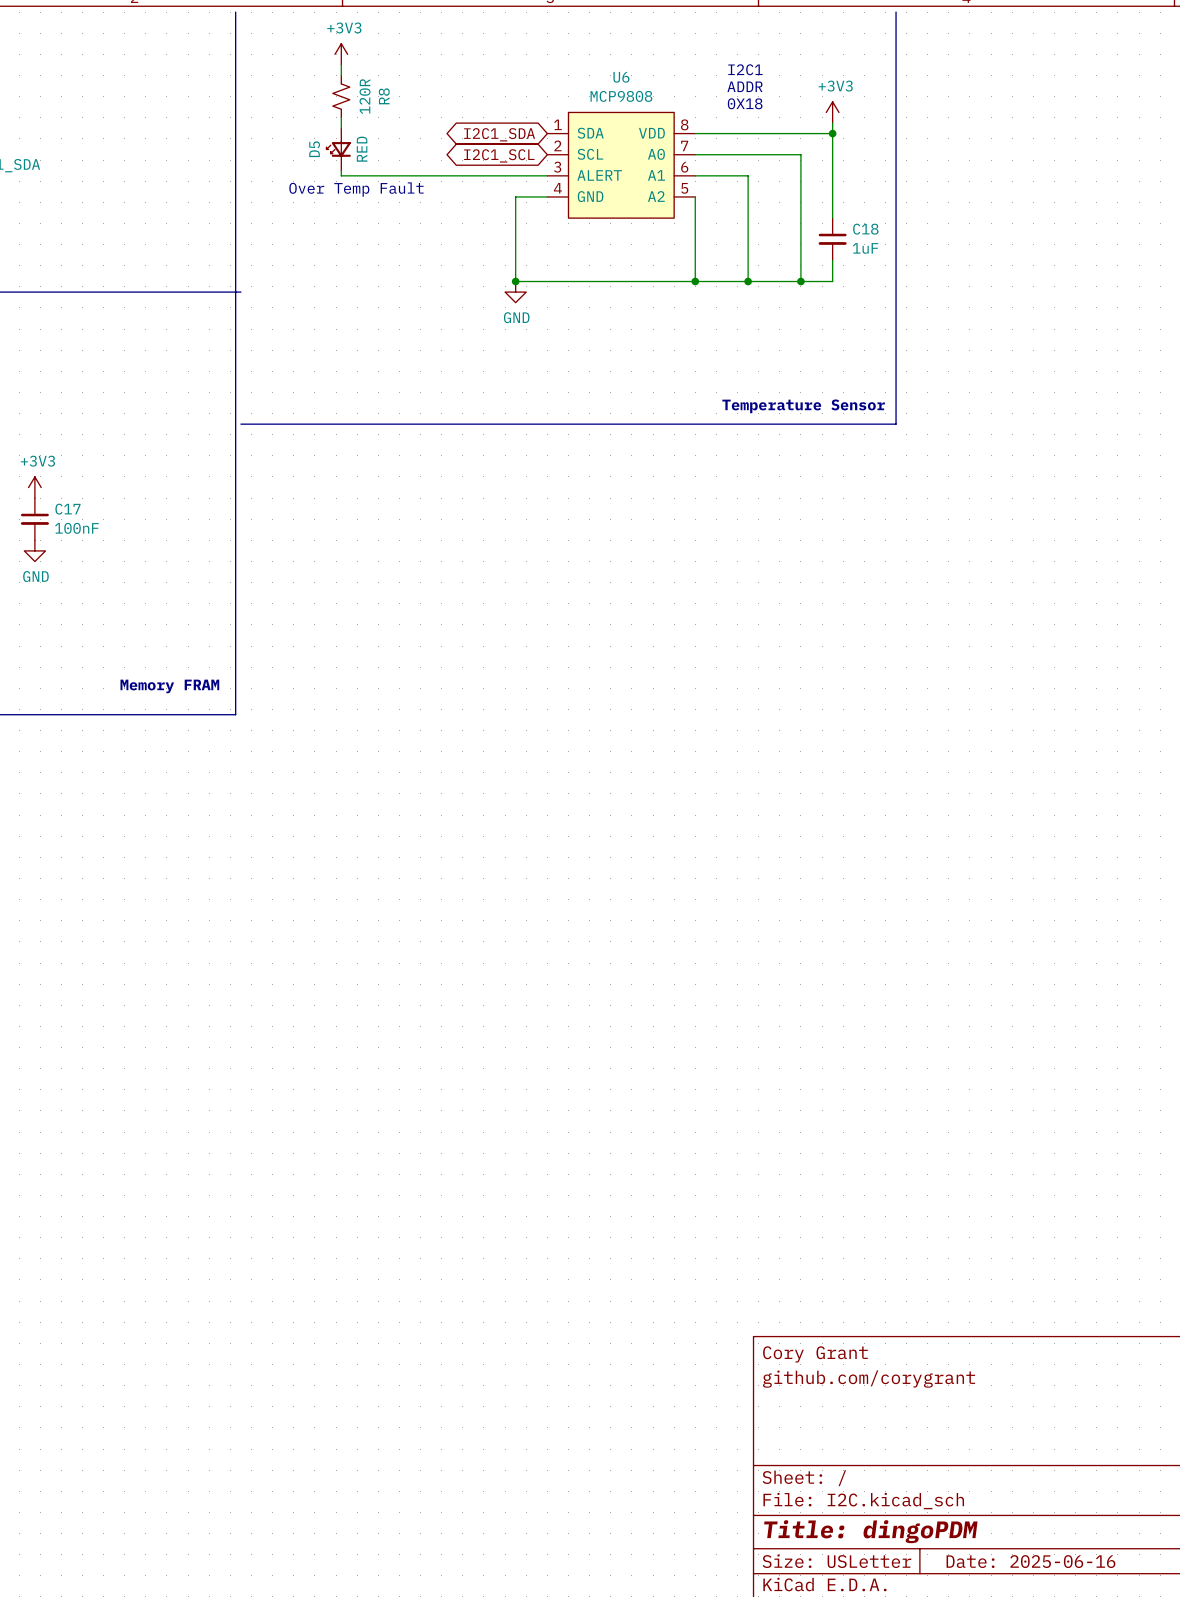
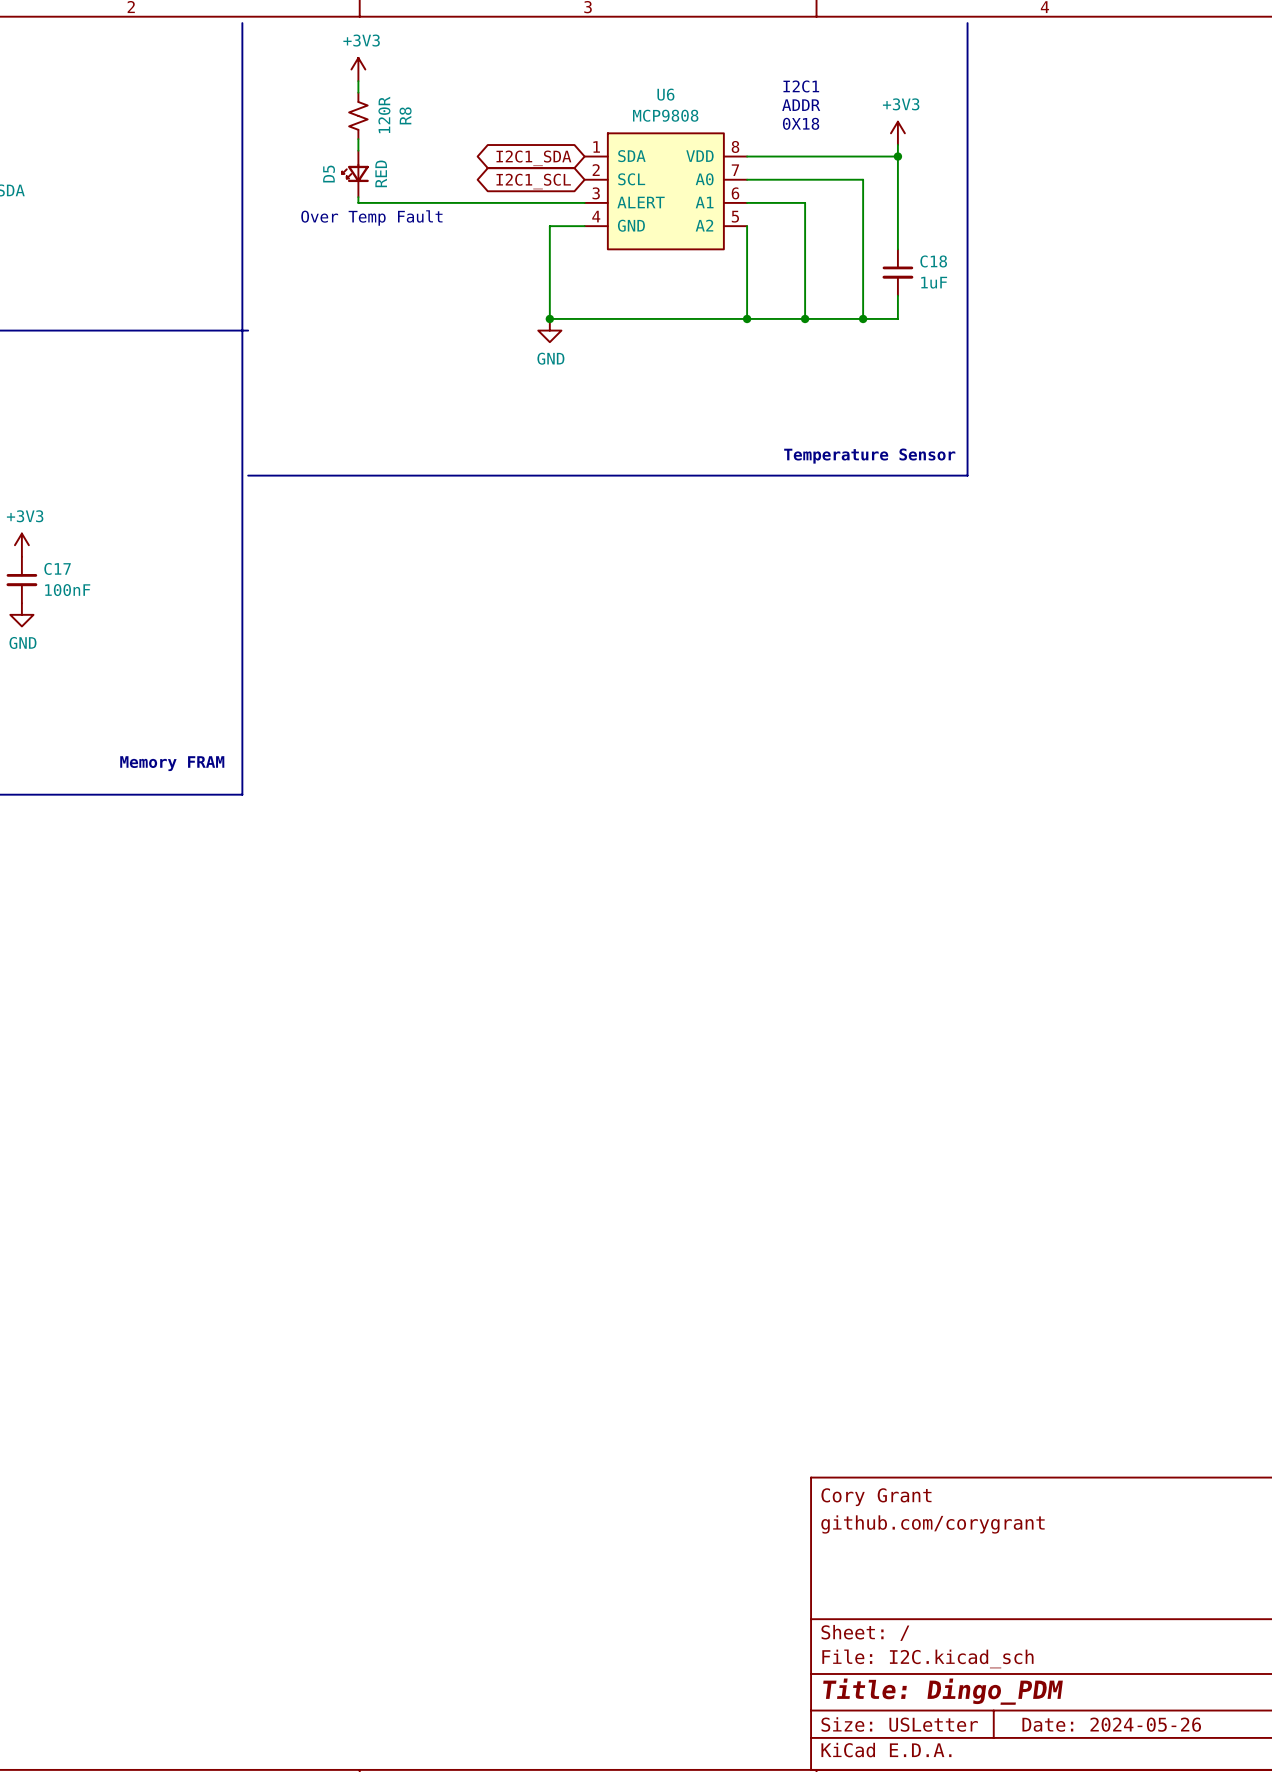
title block: Title: dingoPDM (870, 1531) -> Title: Dingo_PDM (943, 1691)
title block: Date: 2025-06-16 (1030, 1561) -> Date: 2024-05-26 (1111, 1724)

